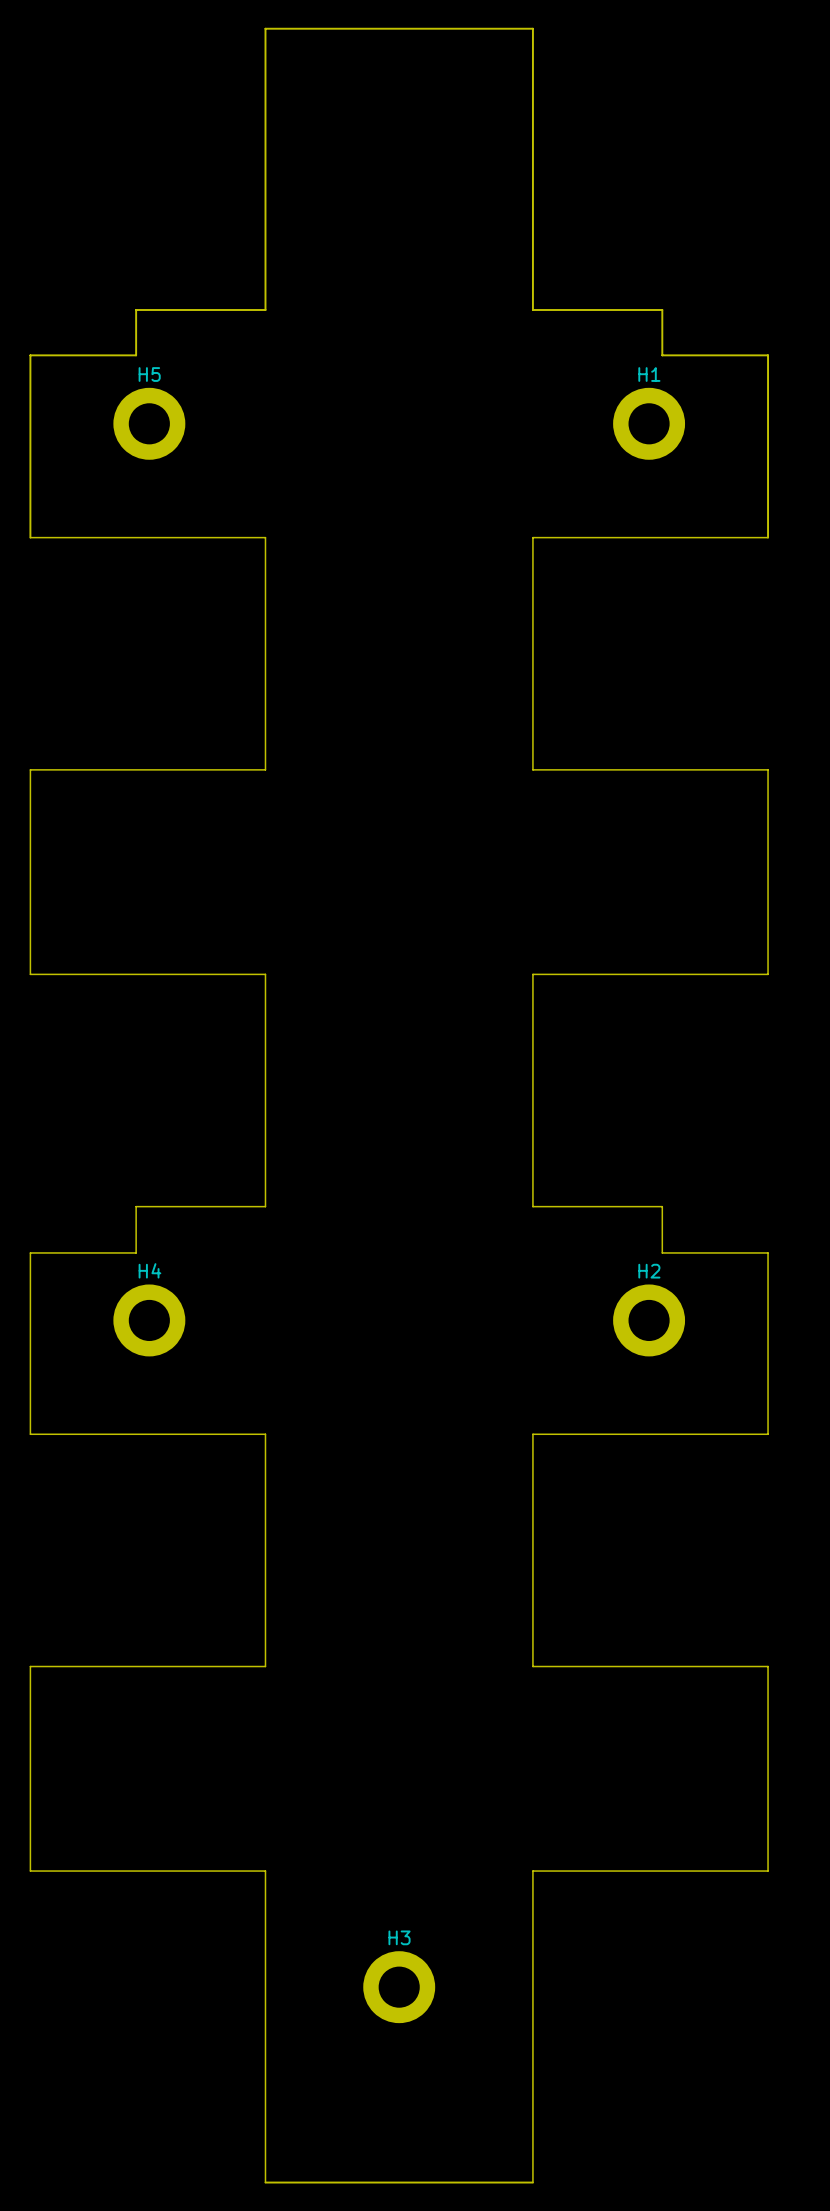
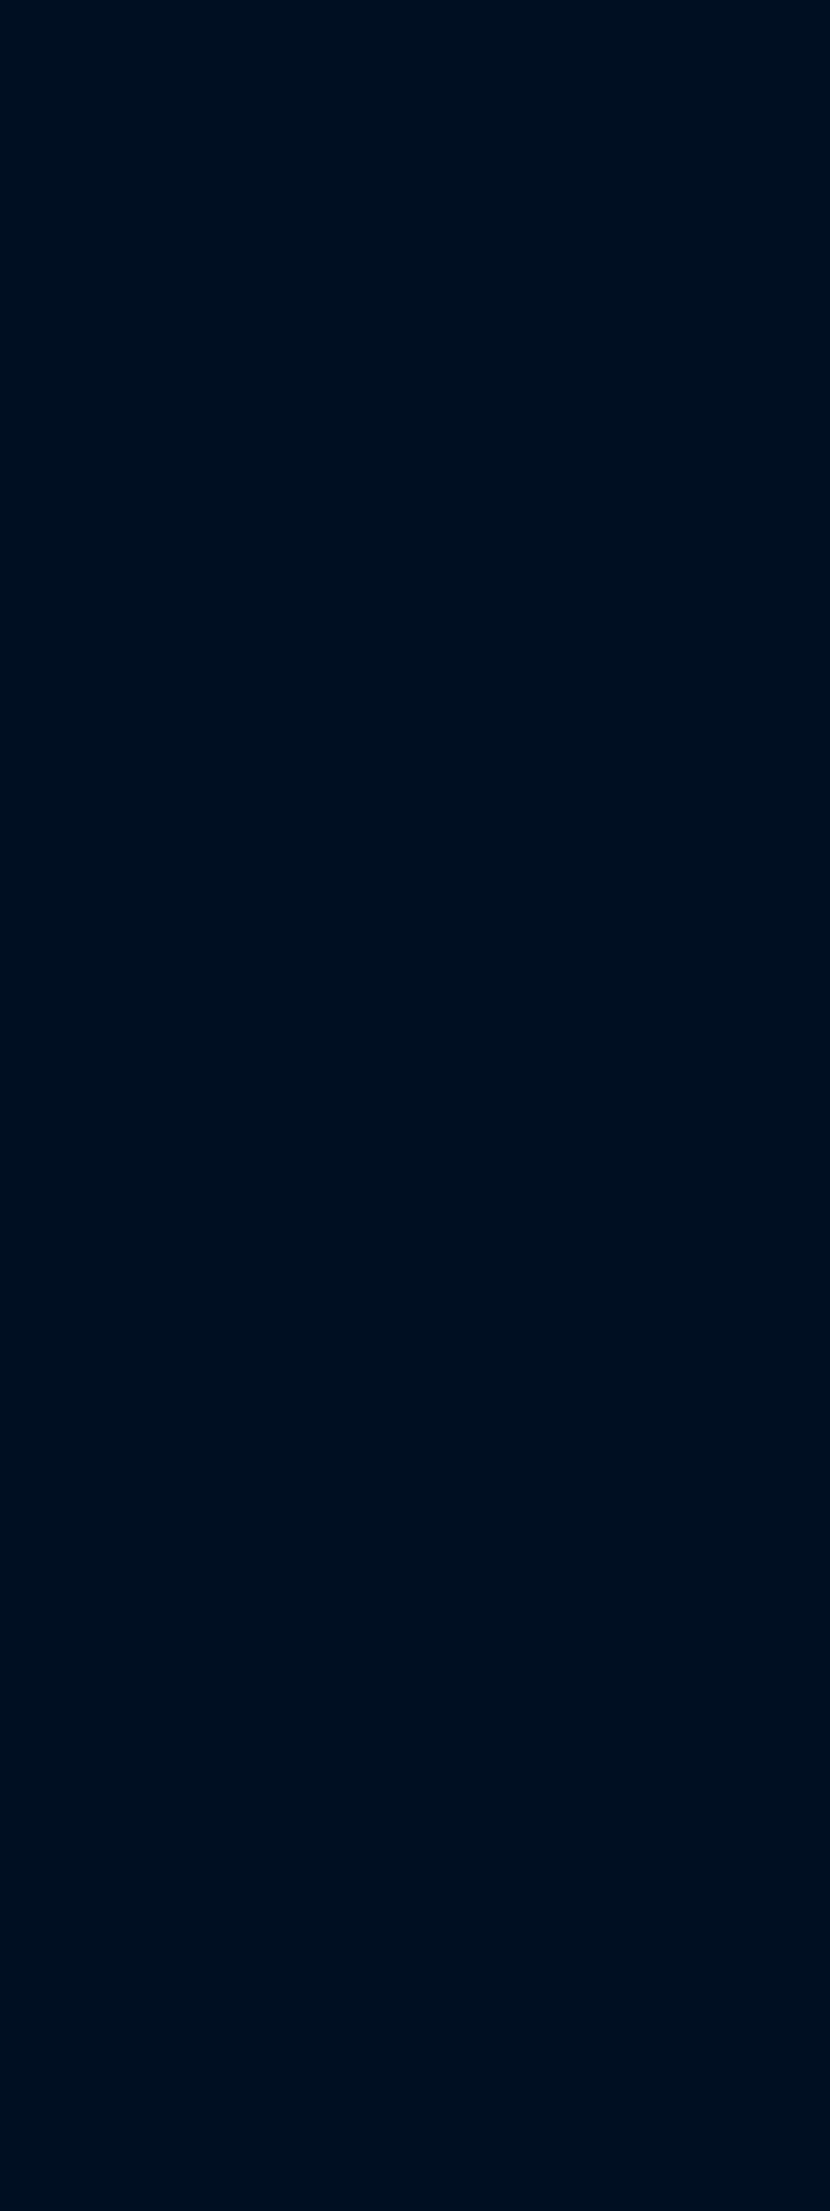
board edge: (265, 28) (532, 28) (532, 309) (662, 309) (662, 355) (768, 355) (768, 537) (532, 537) (532, 769) (768, 769) (768, 974) (532, 974) (532, 1206) (662, 1206) (662, 1252) (768, 1252) (768, 1434) (532, 1434) (532, 1666) (768, 1666) (768, 1871) (532, 1871) (532, 2182) (265, 2182) (265, 1871) (30, 1871) (30, 1666) (265, 1666) (265, 1434) (30, 1434) (30, 1252) (136, 1252) (136, 1206) (265, 1206) (265, 974) (30, 974) (30, 769) (265, 769) (265, 537) (30, 537) (30, 355) (136, 355) (136, 309) (265, 309) (265, 28) -> none
H5: (149, 423) -> none
H1: (649, 423) -> none
H4: (149, 1320) -> none
H2: (649, 1320) -> none
H3: (399, 1987) -> none

